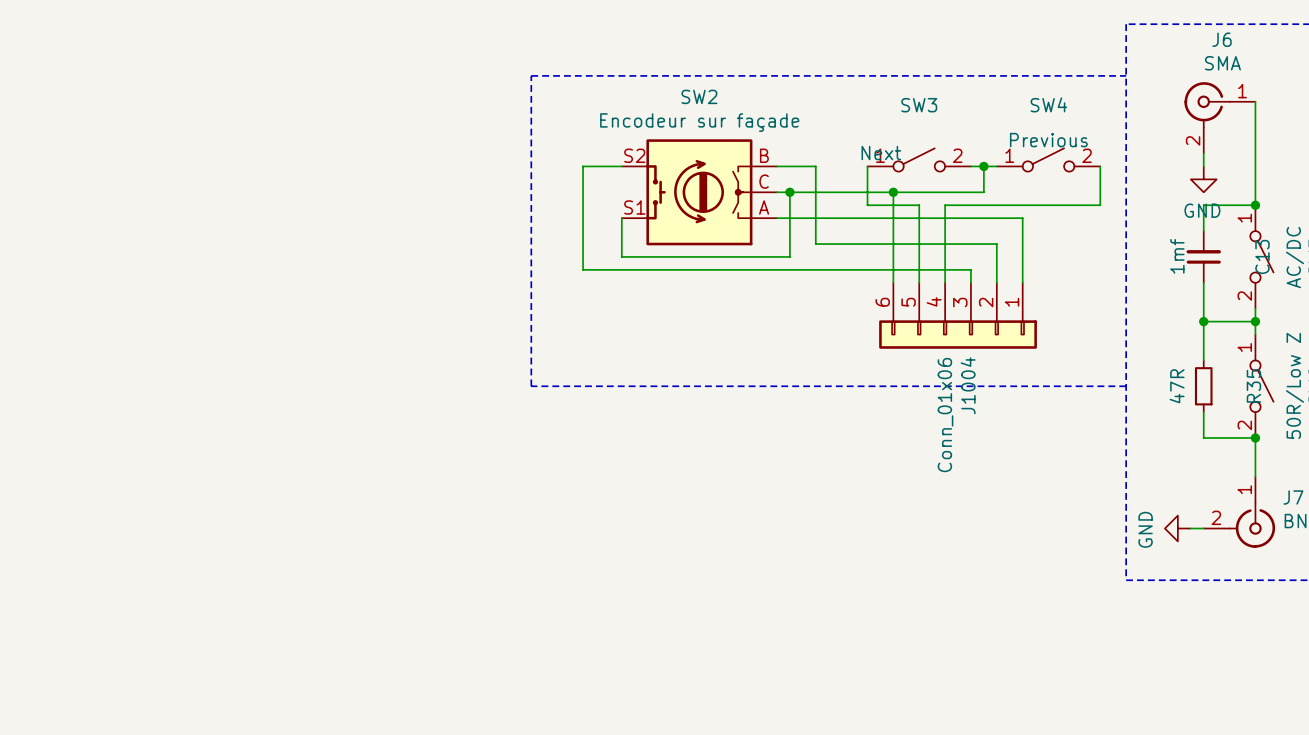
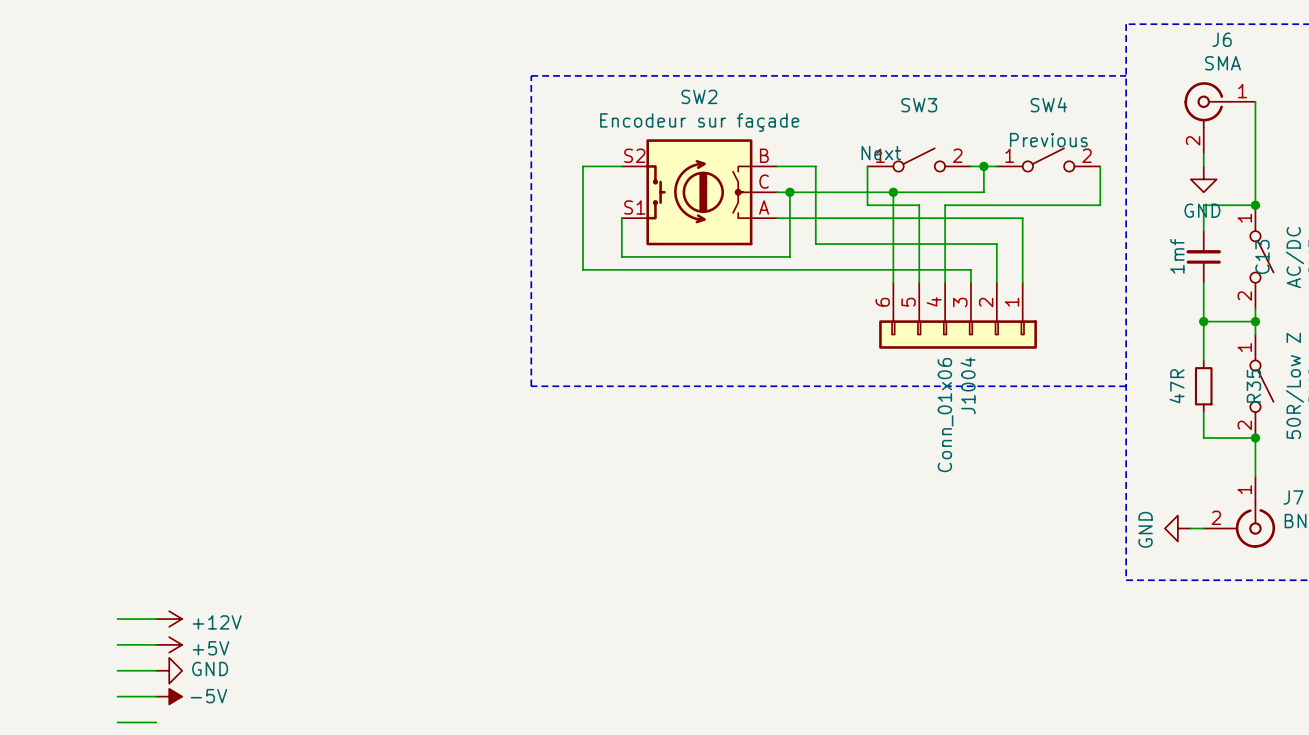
wire: none -> (117, 619) (156, 619)
power symbol: none -> +12V (169, 619)
wire: none -> (117, 644) (156, 644)
power symbol: none -> +5V (169, 644)
wire: none -> (117, 670) (156, 670)
power symbol: none -> GND (169, 670)
wire: none -> (117, 696) (156, 696)
power symbol: none -> -5V (169, 696)
wire: none -> (117, 722) (156, 722)

